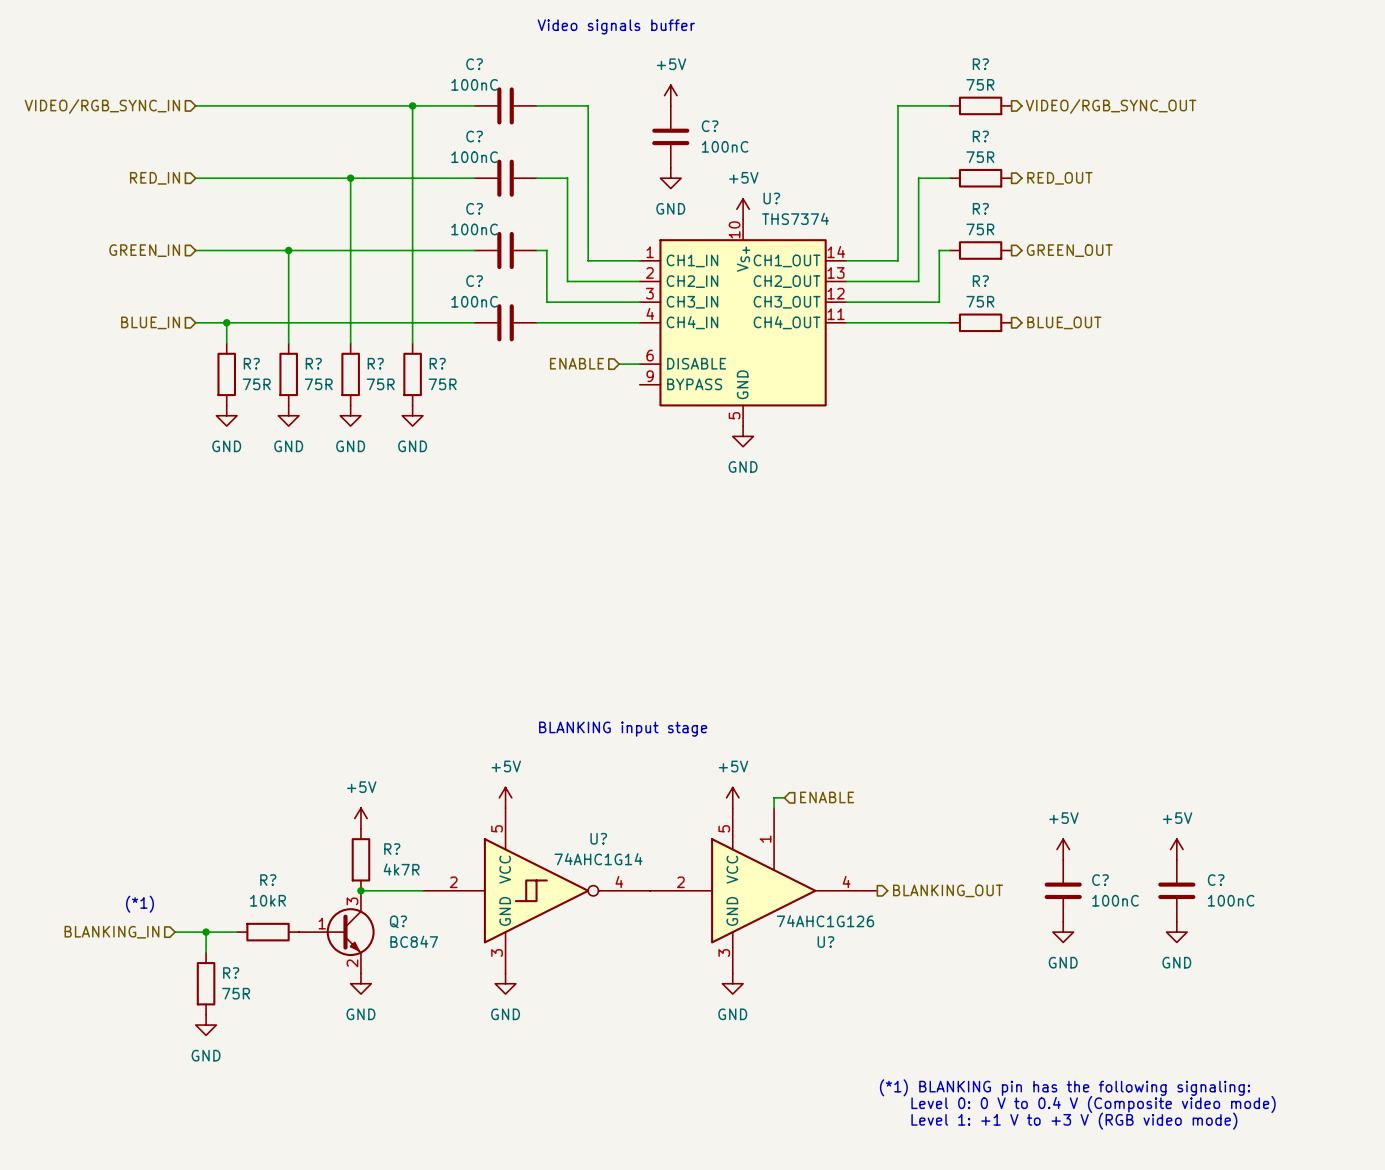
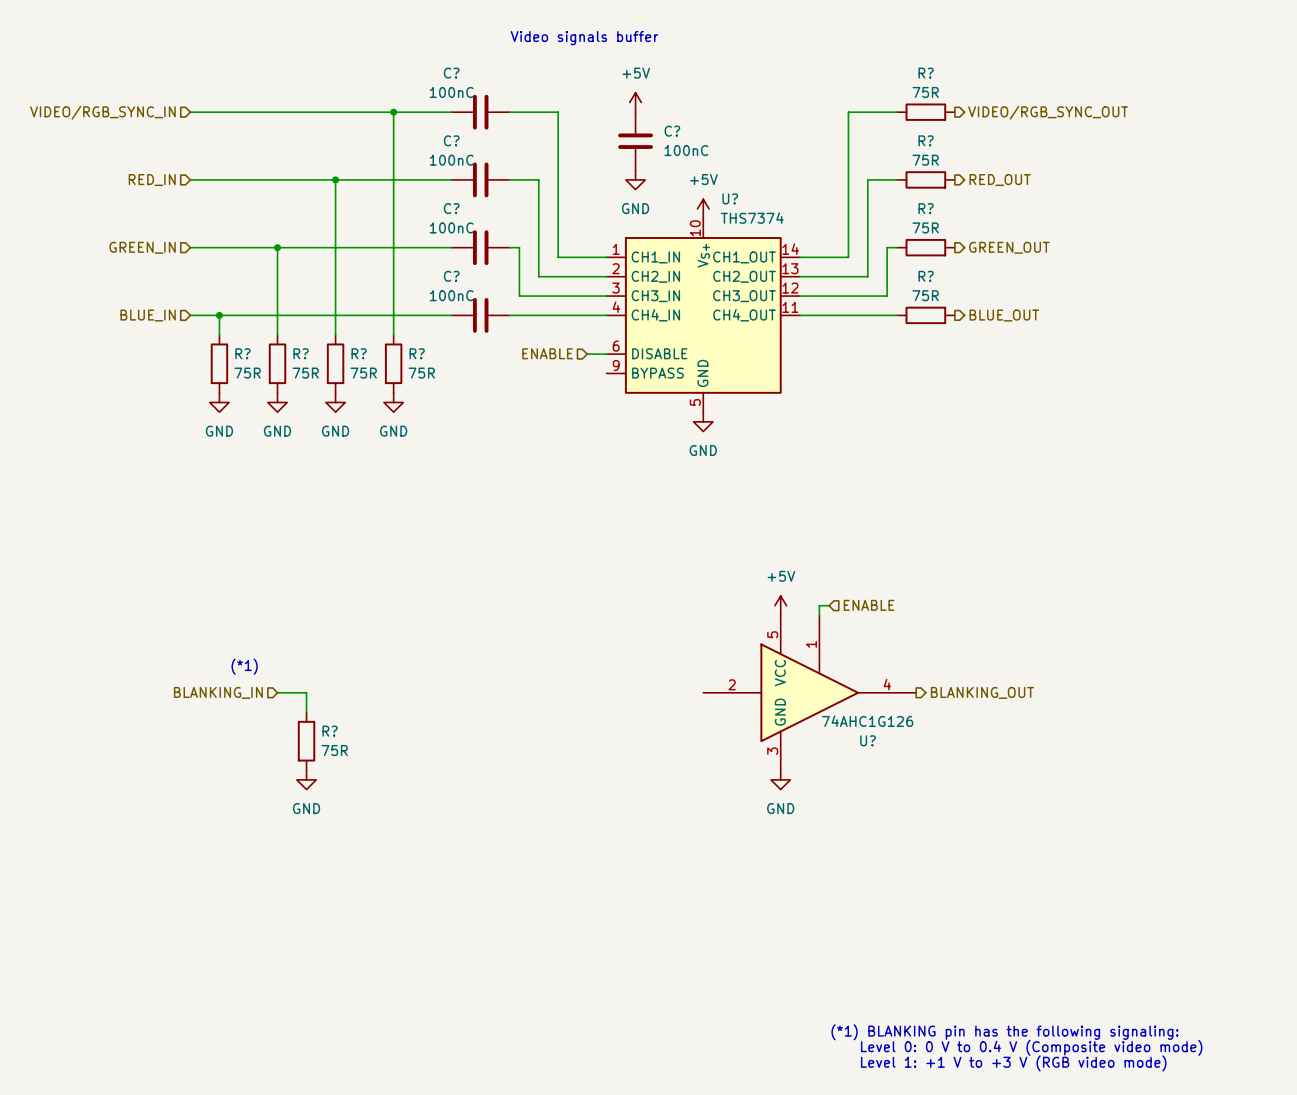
power symbol: none -> +5V (780, 605)
text: none -> (*1) (244, 666)
hierarchical label: none -> BLANKING_IN (218, 692)
wire: none -> (277, 692) (306, 692) (306, 712)
text: BLANKING input stage (623, 729) -> none
R?: none -> 75R (306, 741)
power symbol: +5V (505, 797) -> none
power symbol: +5V (732, 797) -> none
wire: (784, 797) (774, 797) (774, 808) -> (829, 605) (819, 605) (819, 615)
hierarchical label position: ENABLE (827, 797) -> ENABLE (869, 605)
power symbol: none -> GND (306, 779)
power symbol: +5V (360, 818) -> none
power symbol: none -> GND (780, 779)
power symbol: +5V (1063, 849) -> none
power symbol: +5V (1176, 849) -> none
R?: 4k7R (360, 859) -> none
wire: (360, 890) (422, 890) -> none
junction: (360, 890) -> none
U?: 74AHC1G14 (536, 890) -> none
U? position: (763, 890) -> (809, 692)
hierarchical label position: BLANKING_OUT (948, 890) -> BLANKING_OUT (982, 692)
C?: 100nC (1063, 890) -> none
C?: 100nC (1176, 890) -> none
text: (*1) (140, 904) -> none
hierarchical label: BLANKING_IN (111, 932) -> none
wire: (175, 932) (237, 932) -> none
wire: (206, 932) (206, 952) -> none
junction: (206, 932) -> none
R?: 10kR (268, 932) -> none
Q?: BC847 (336, 932) -> none
power symbol: GND (1063, 932) -> none
power symbol: GND (1176, 932) -> none
R?: 75R (206, 983) -> none
power symbol: GND (360, 983) -> none
power symbol: GND (505, 983) -> none
power symbol: GND (732, 983) -> none
power symbol: GND (206, 1025) -> none

